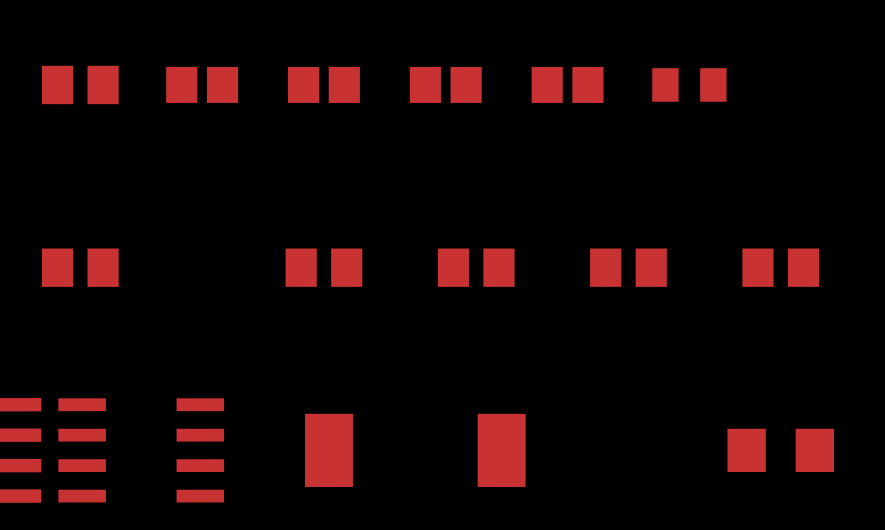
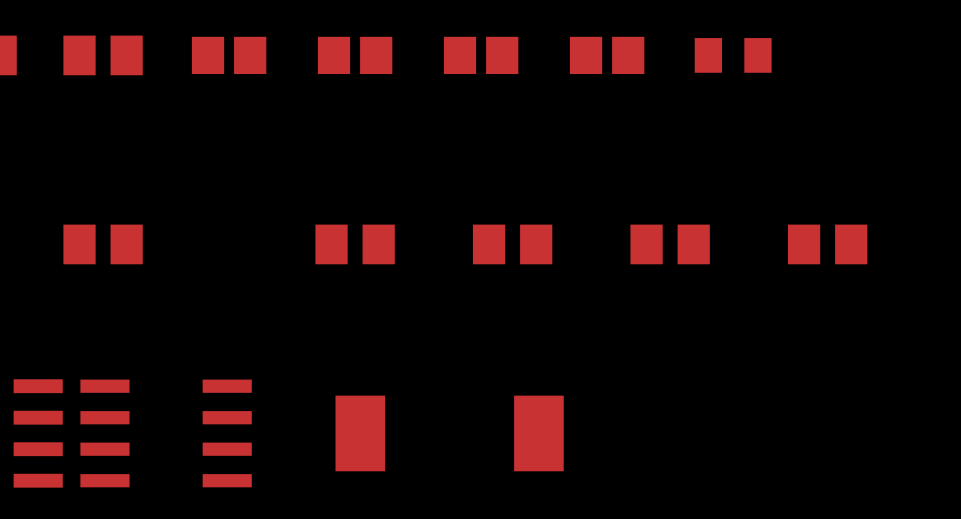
part: (780, 450) -> none

